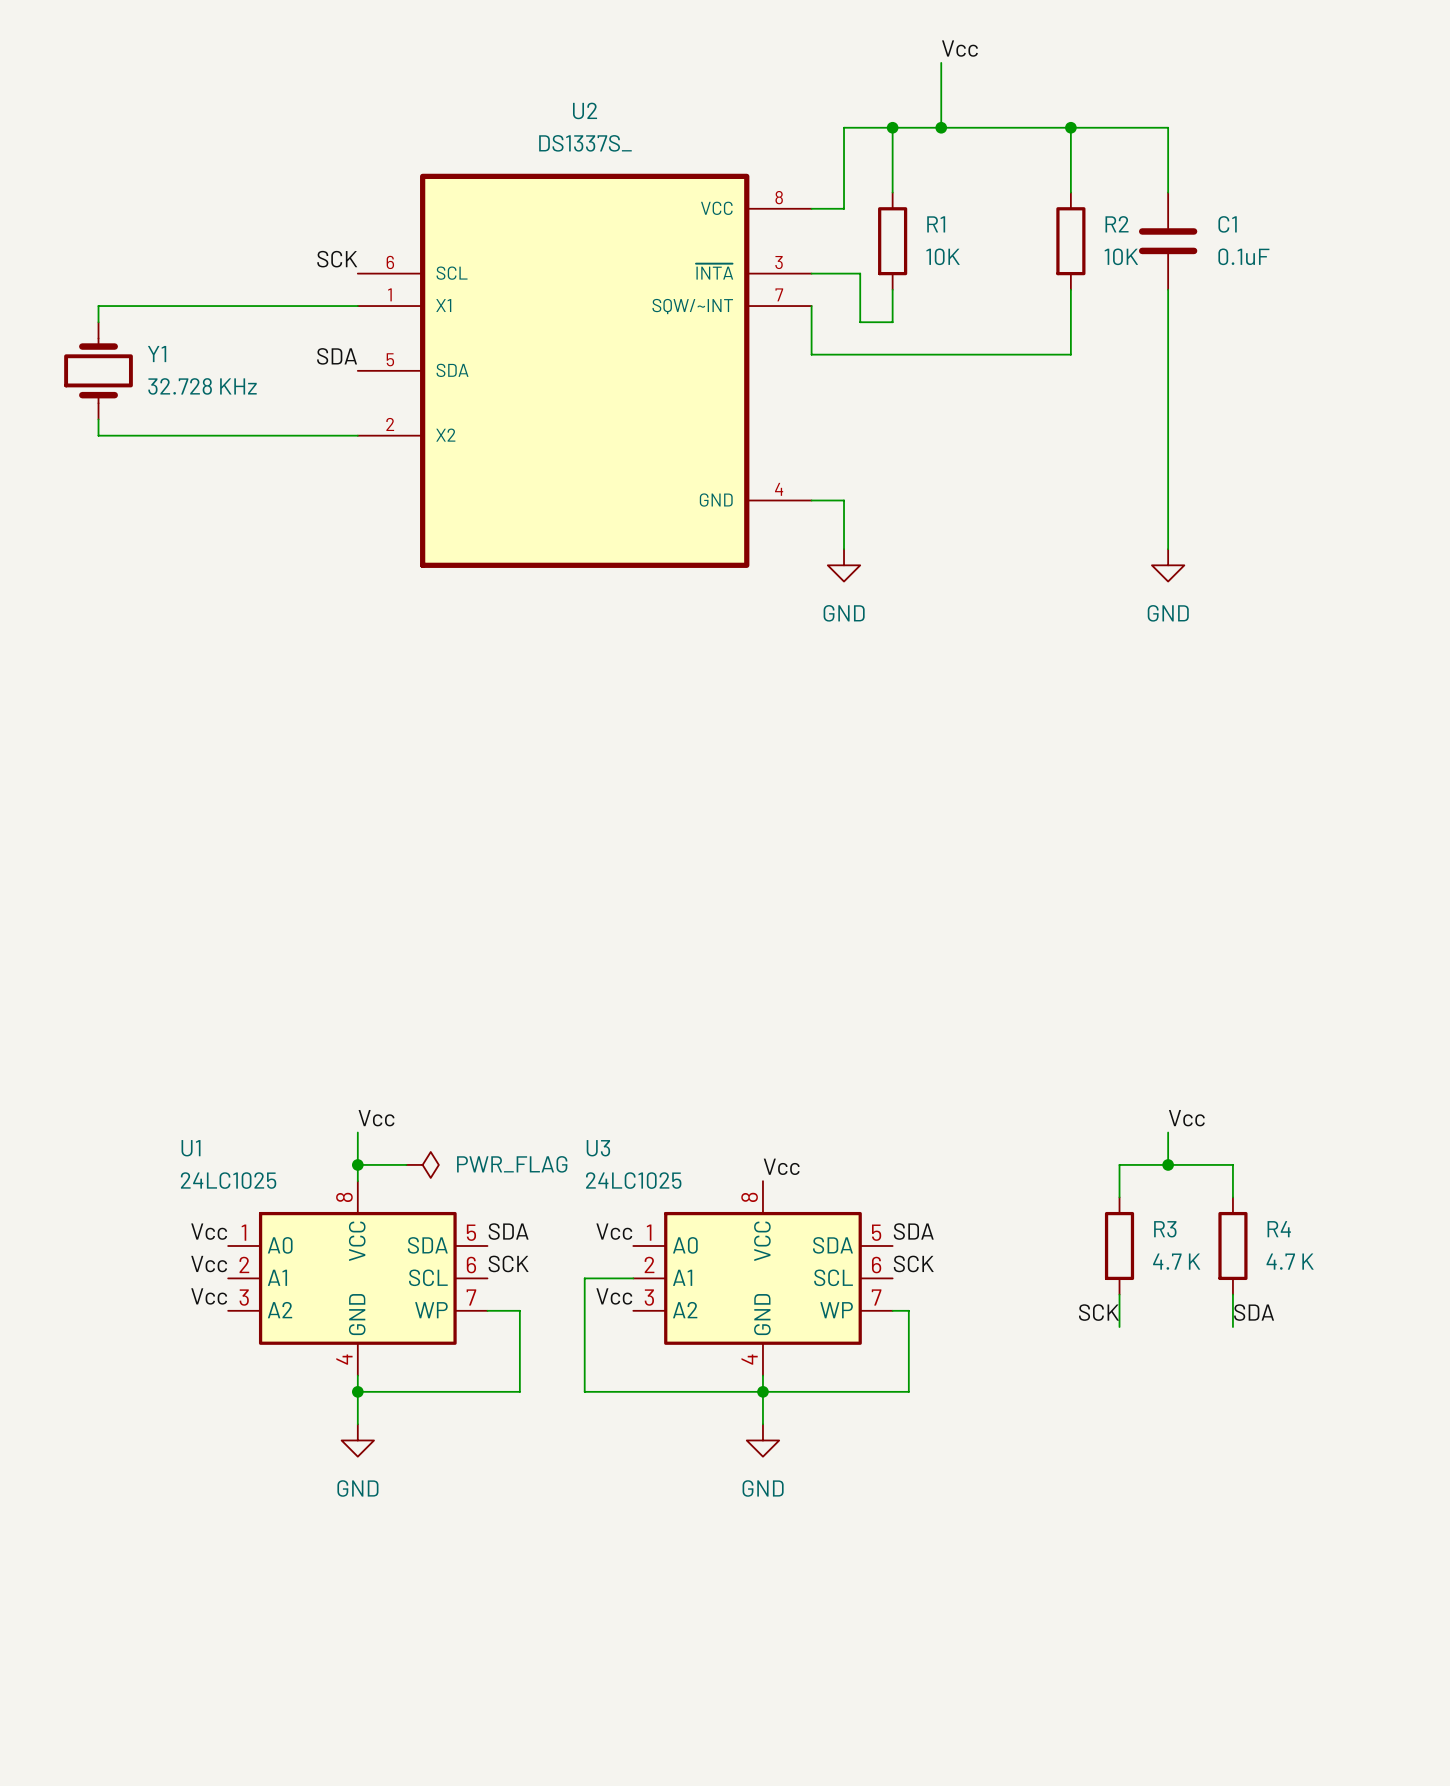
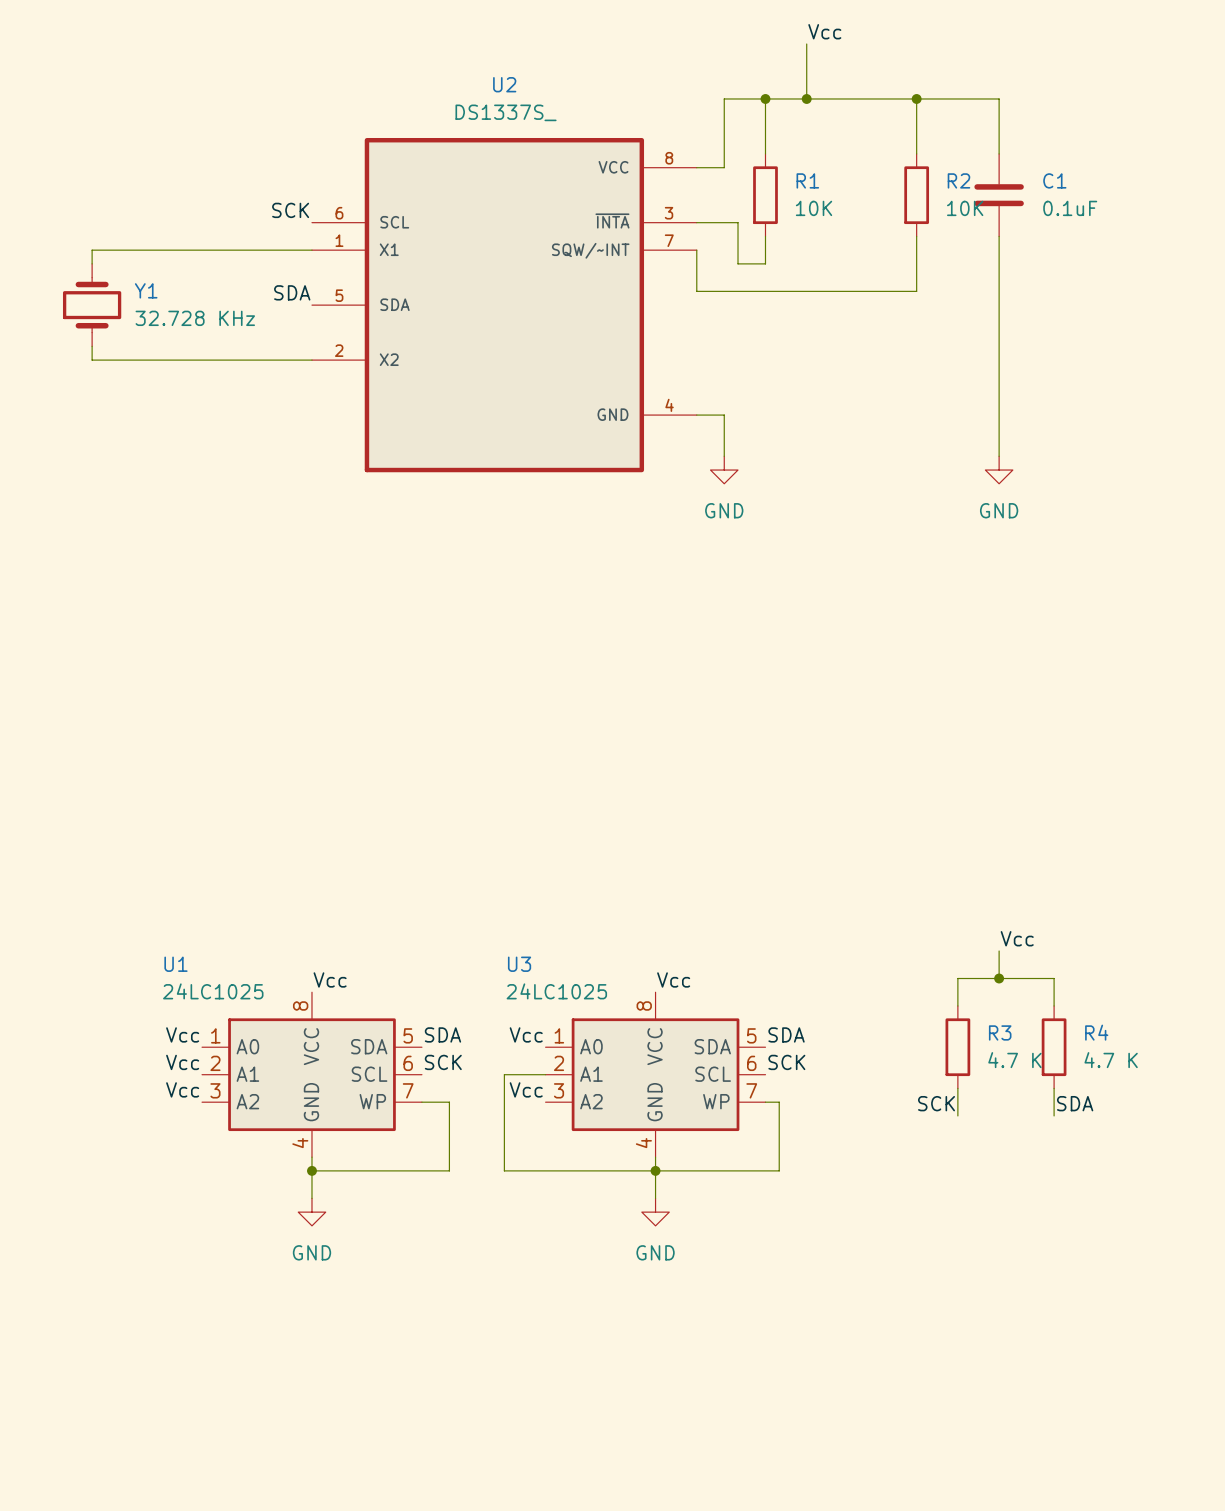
label position: Vcc (376, 1118) -> Vcc (330, 979)
wire: (357, 1132) (357, 1181) -> none
wire: (357, 1164) (406, 1164) -> none
junction: (357, 1164) -> none
power symbol: PWR_FLAG (422, 1164) -> none

